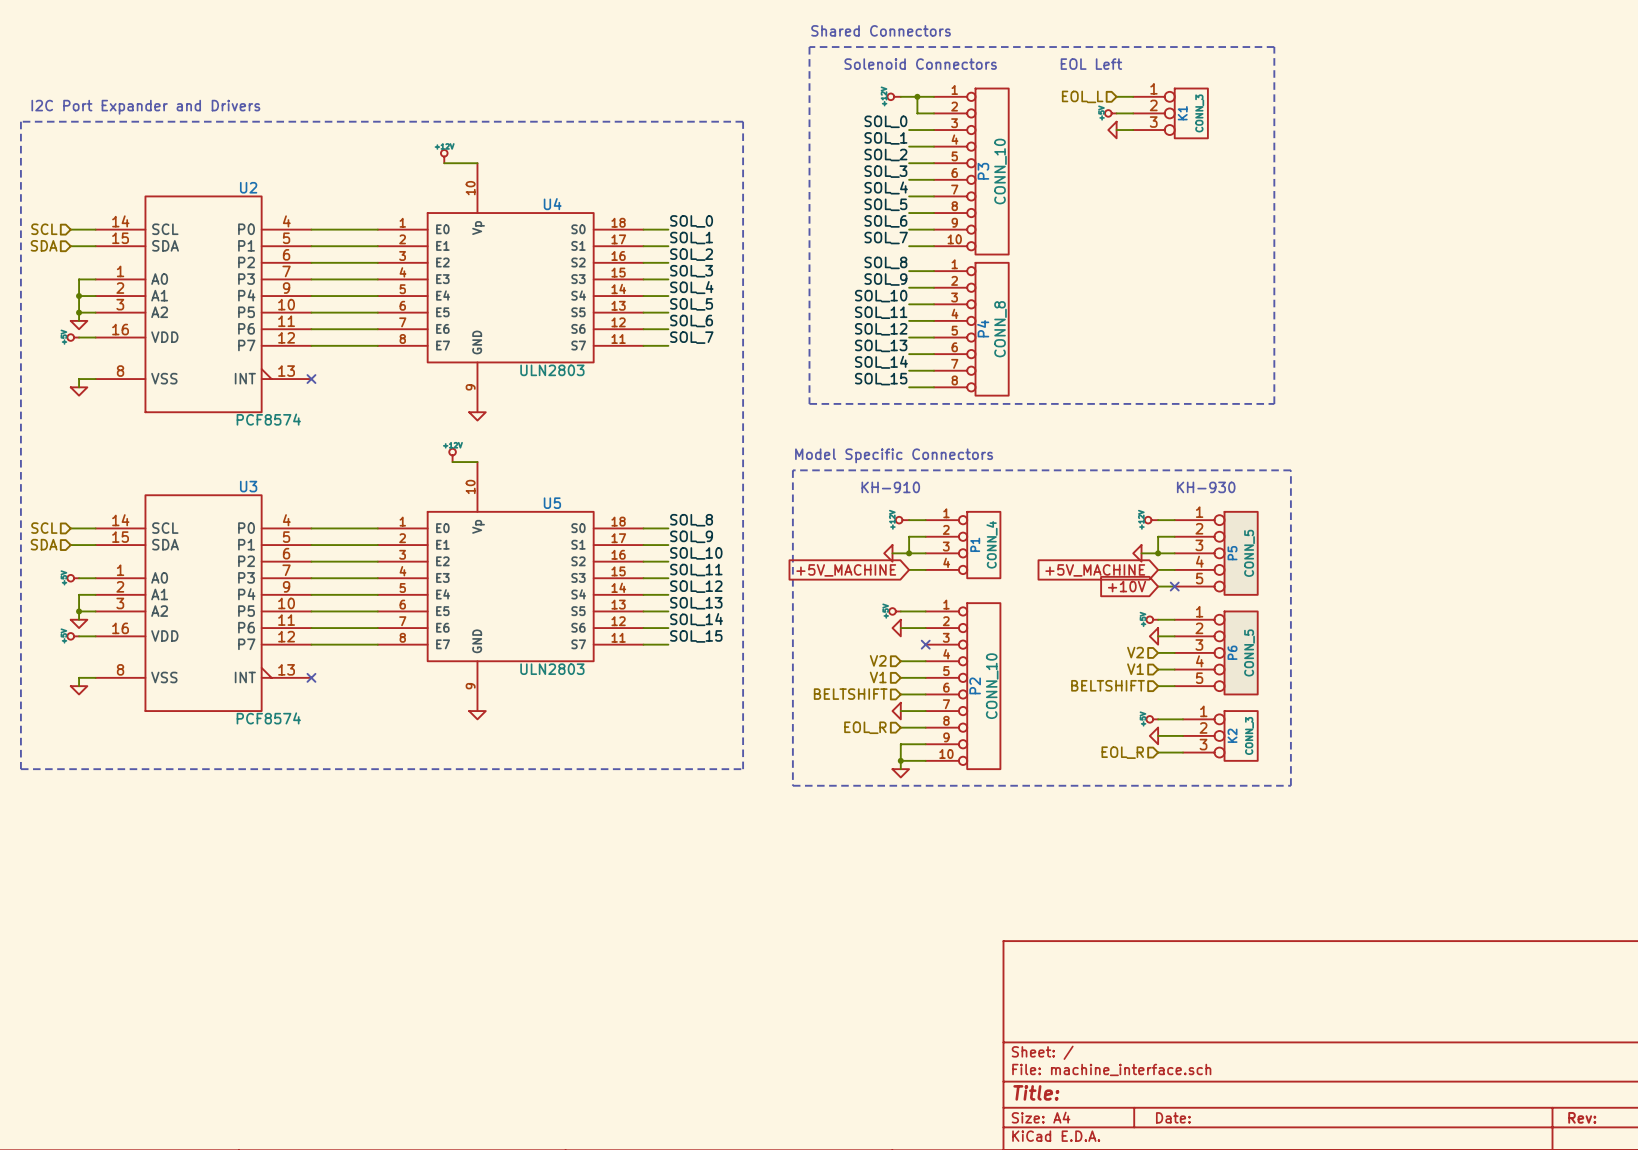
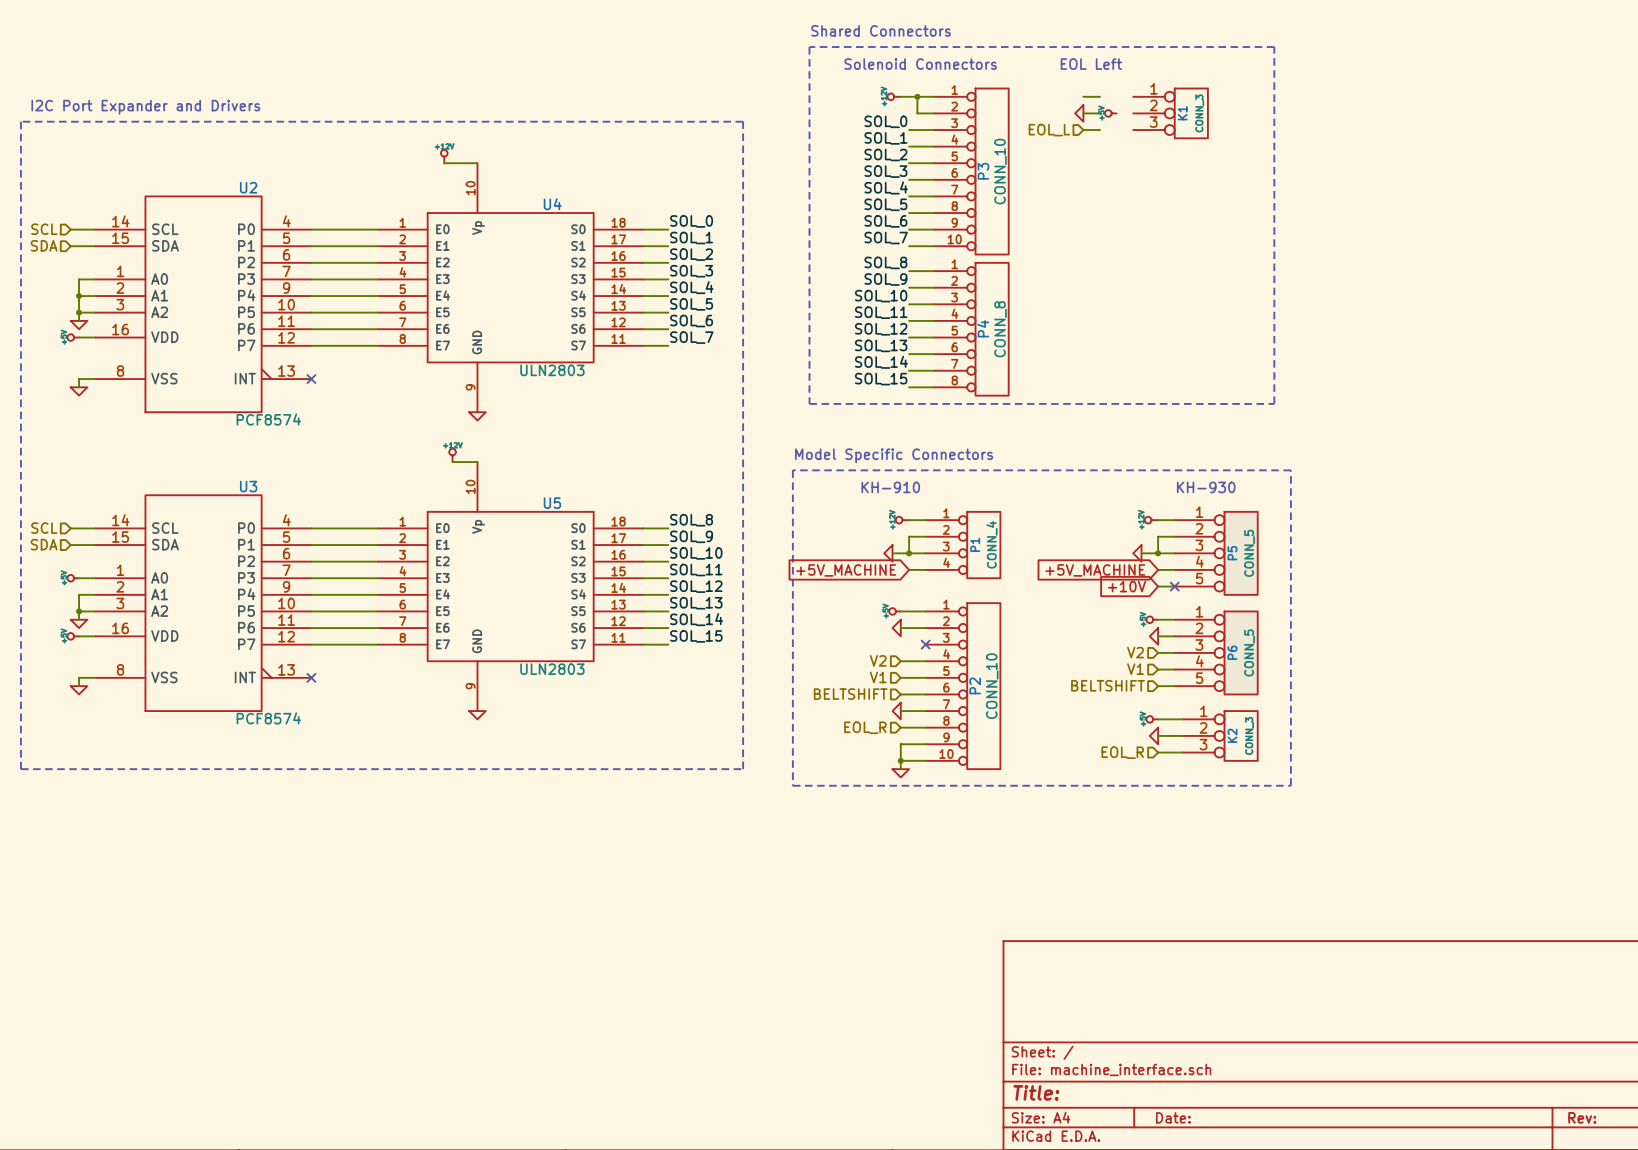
hierarchical label position: EOL_L (1082, 96) -> EOL_L (1049, 130)
wire: (1116, 96) (1133, 96) -> (1083, 96) (1100, 96)
wire: (1116, 113) (1133, 113) -> (1083, 113) (1100, 113)
power symbol position: (1112, 130) -> (1079, 113)
wire: (1116, 130) (1133, 130) -> (1083, 130) (1100, 130)

